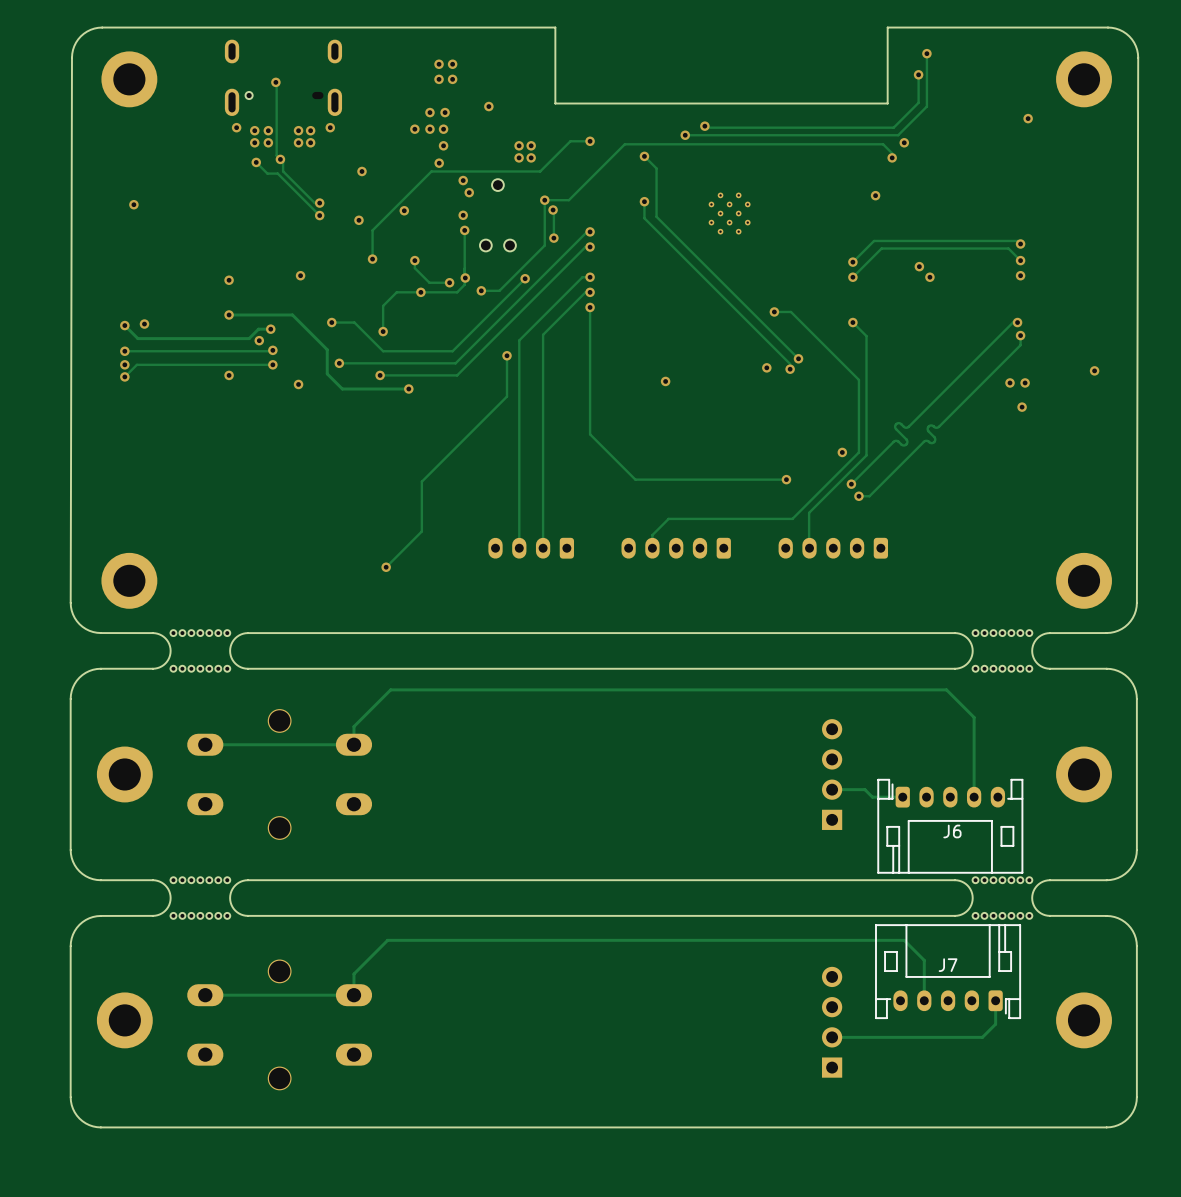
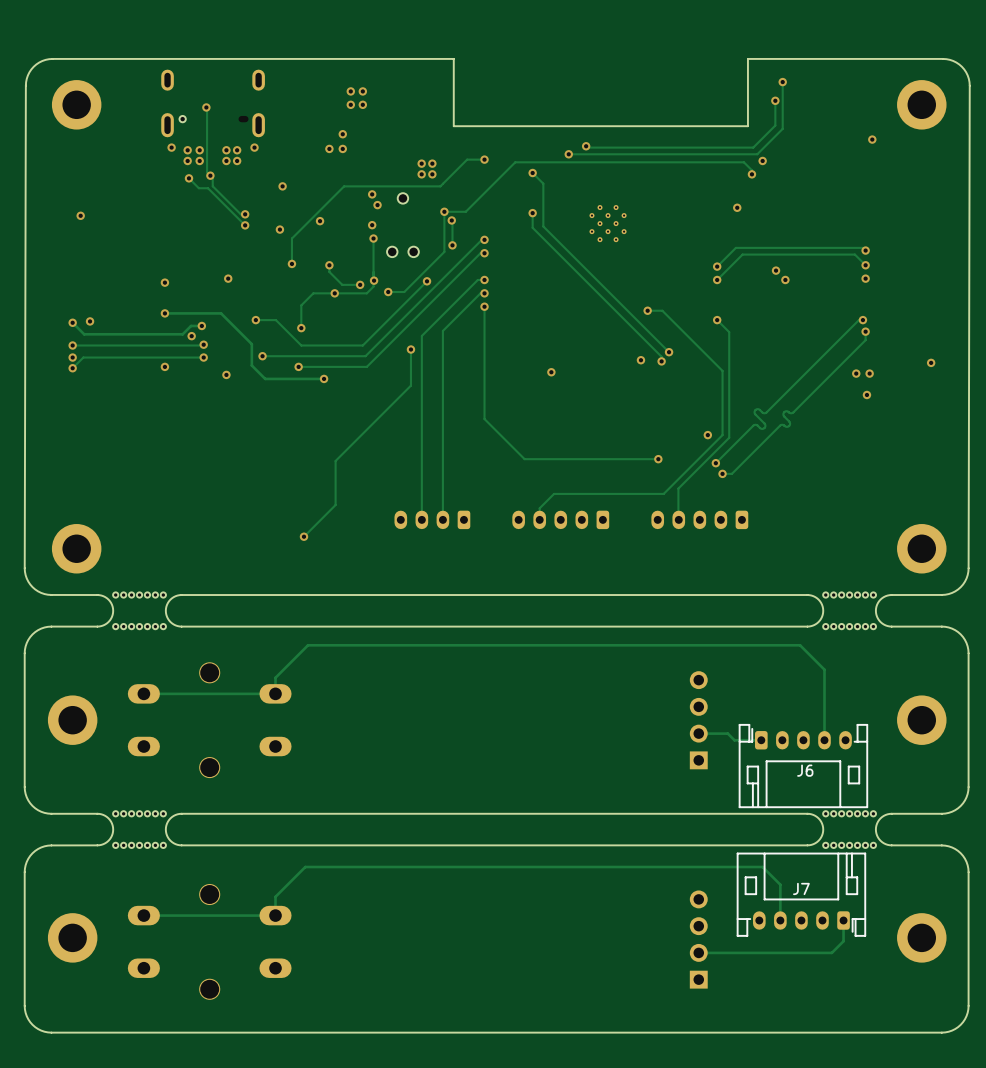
via: (488, 106) -> none
via: (445, 112) -> none
via: (443, 129) -> none
via: (443, 145) -> none
via: (439, 163) -> none

